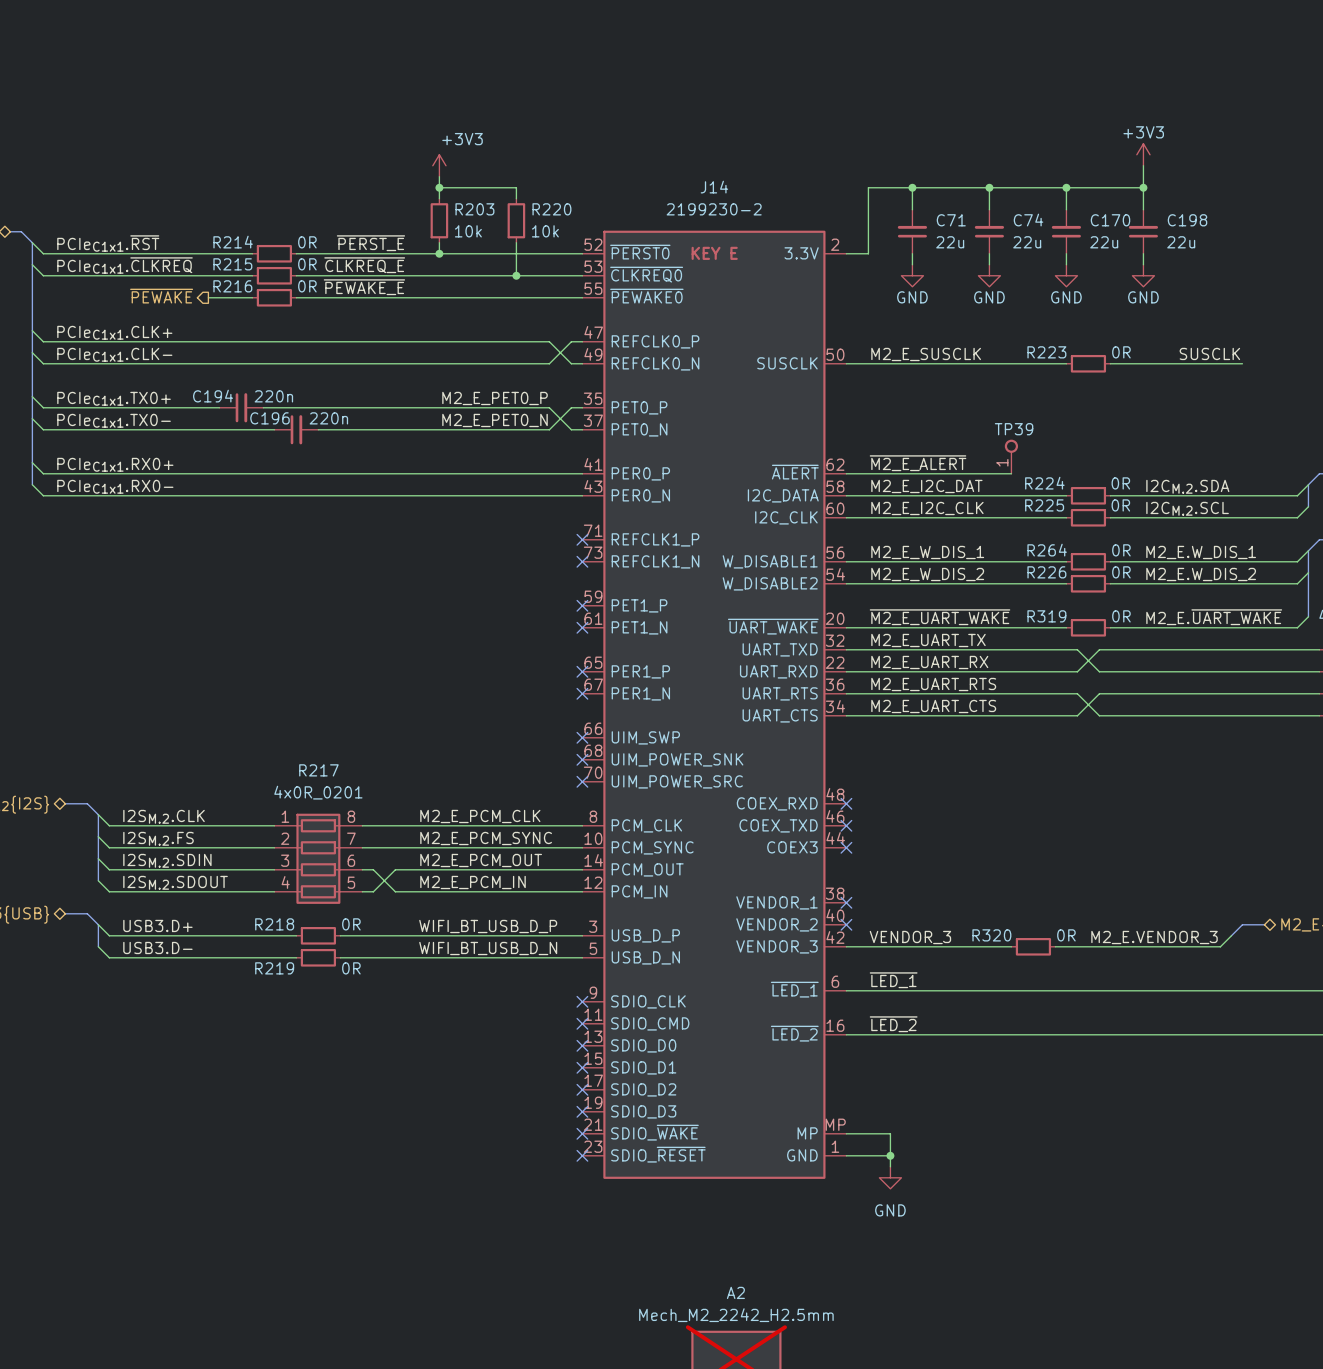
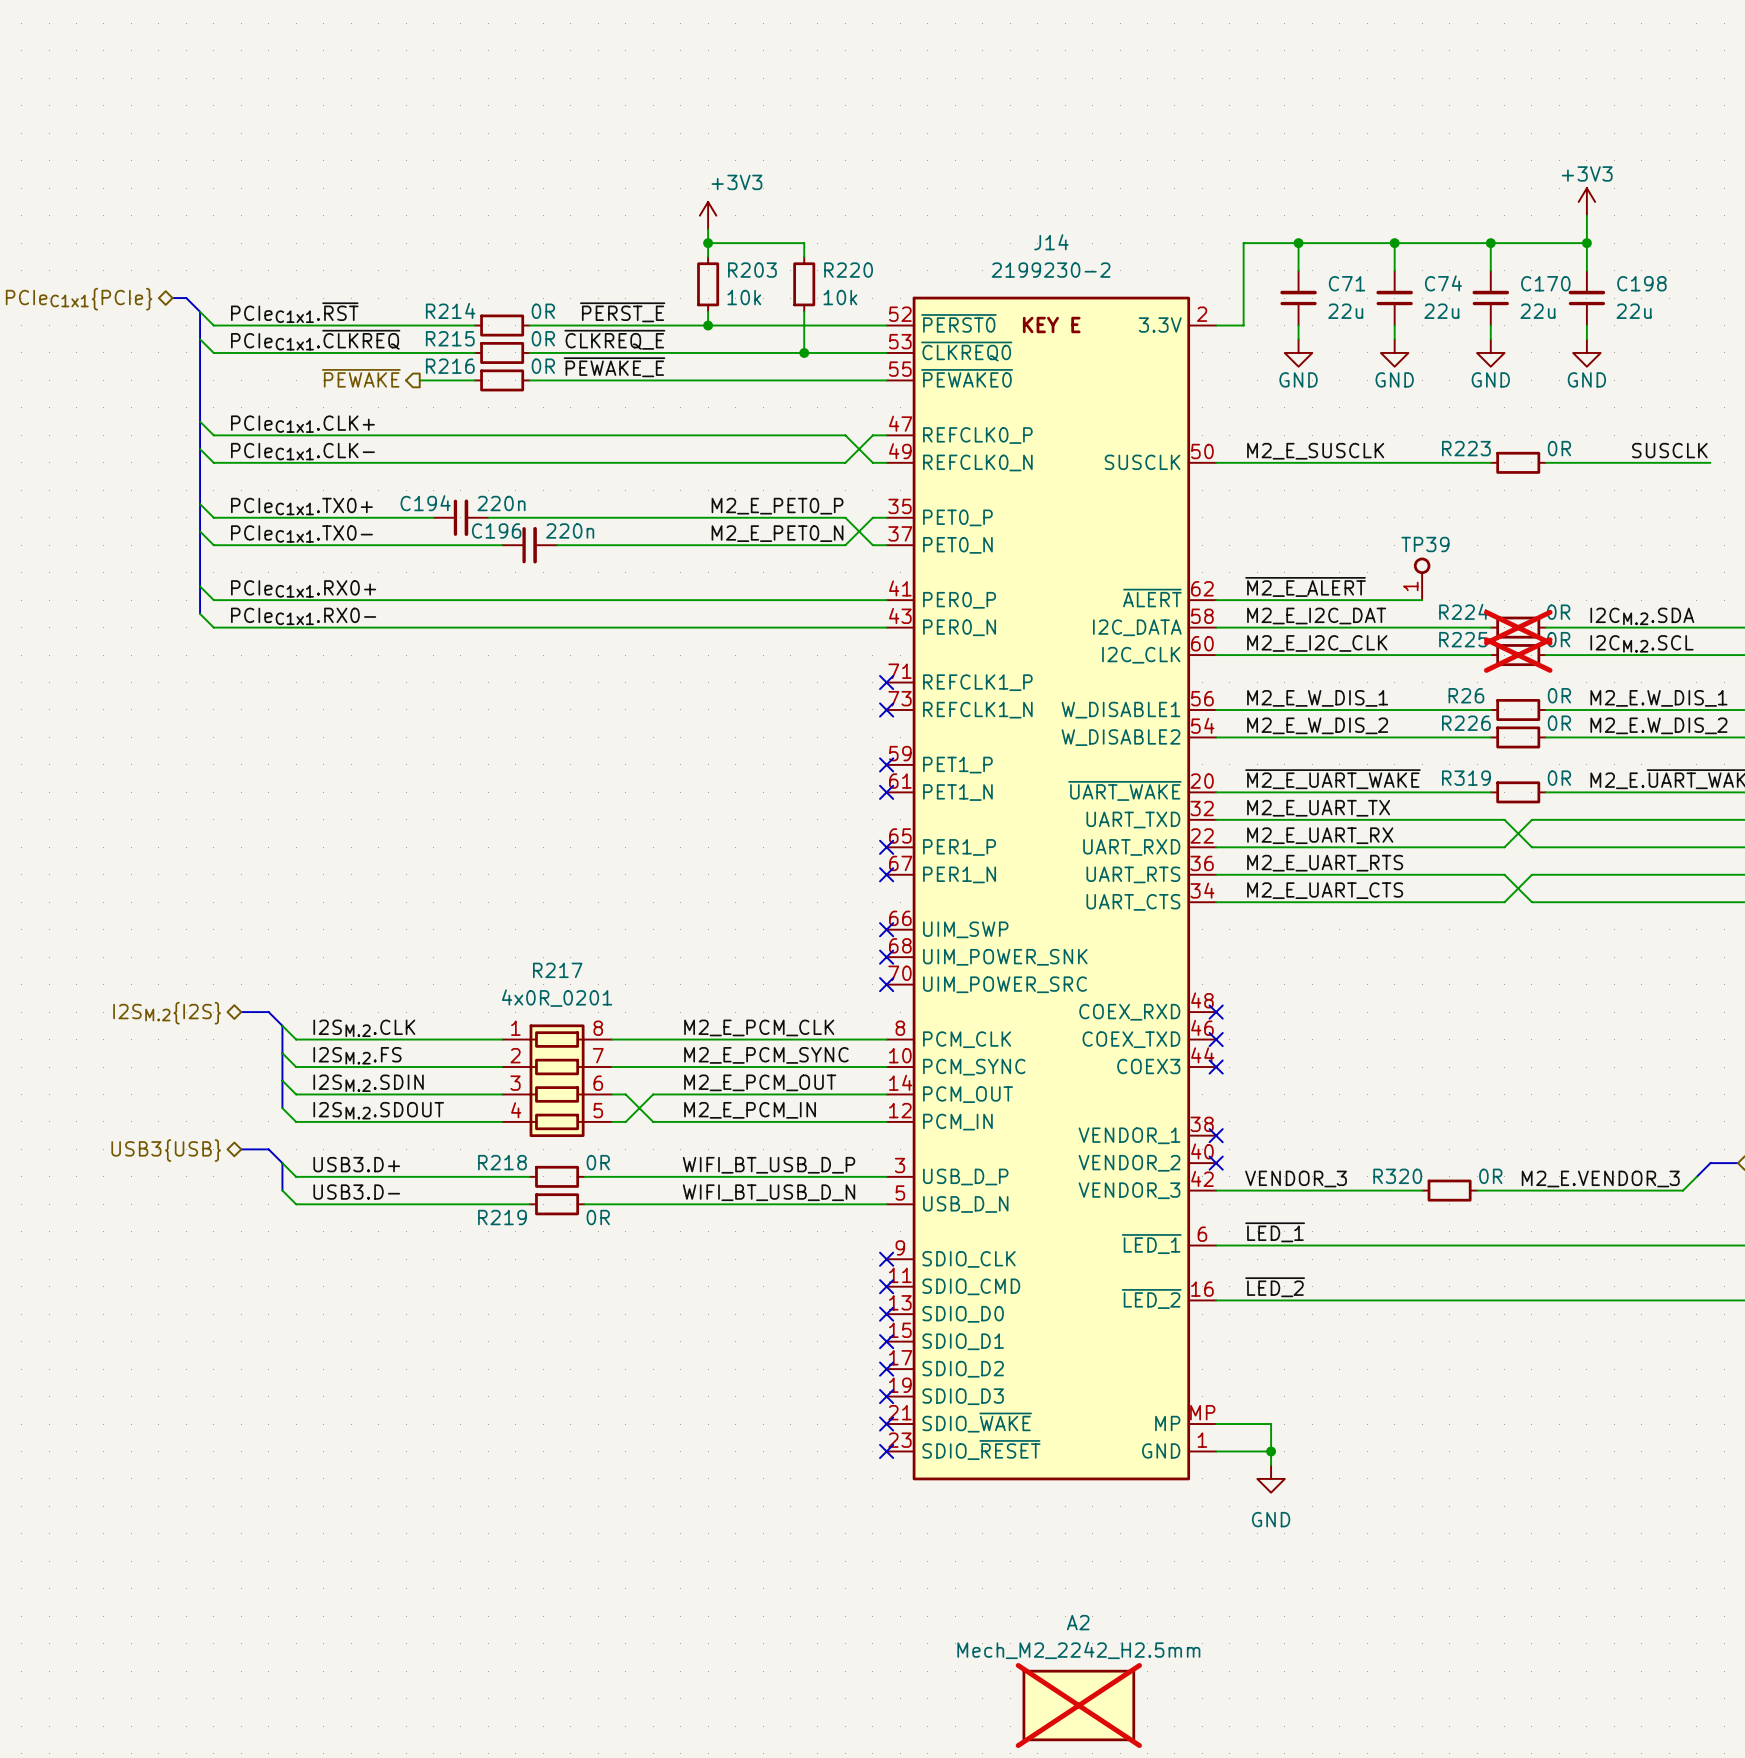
R224 do-not-place cross: none -> (1518, 627)
R225 do-not-place cross: none -> (1518, 655)
R264 name: R264 (1047, 550) -> R26 (1466, 695)

